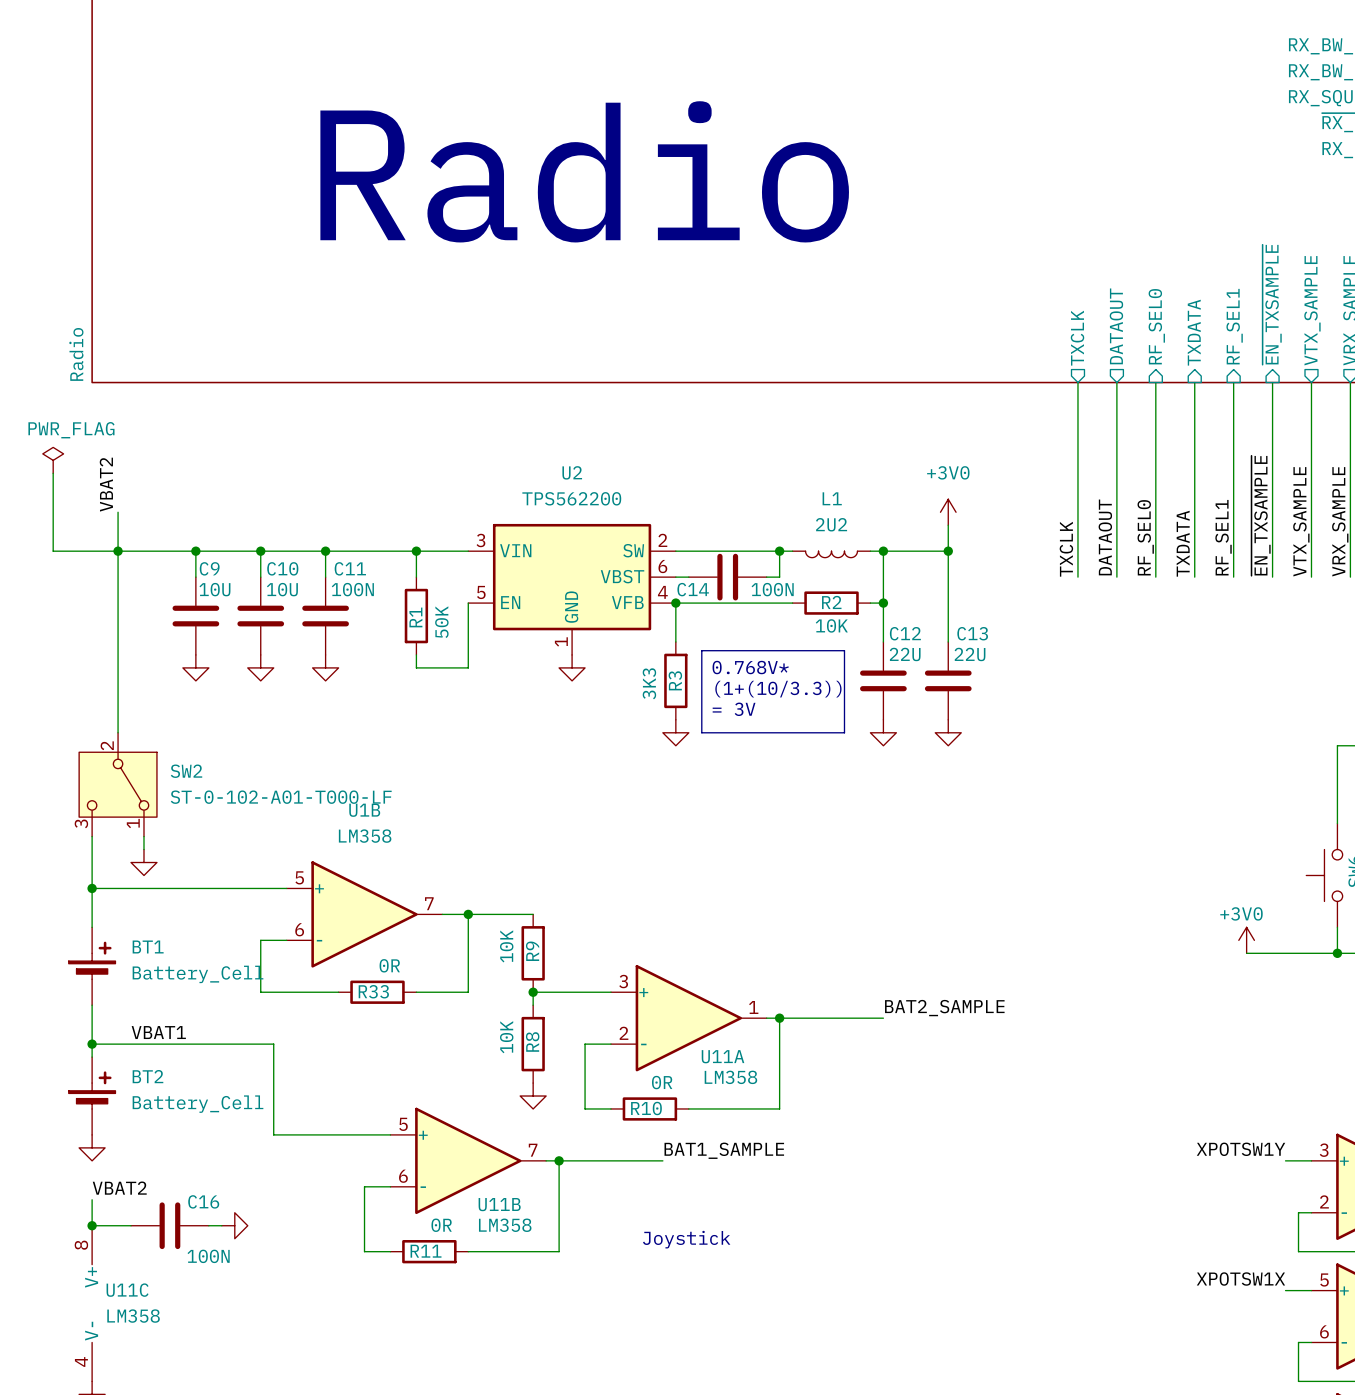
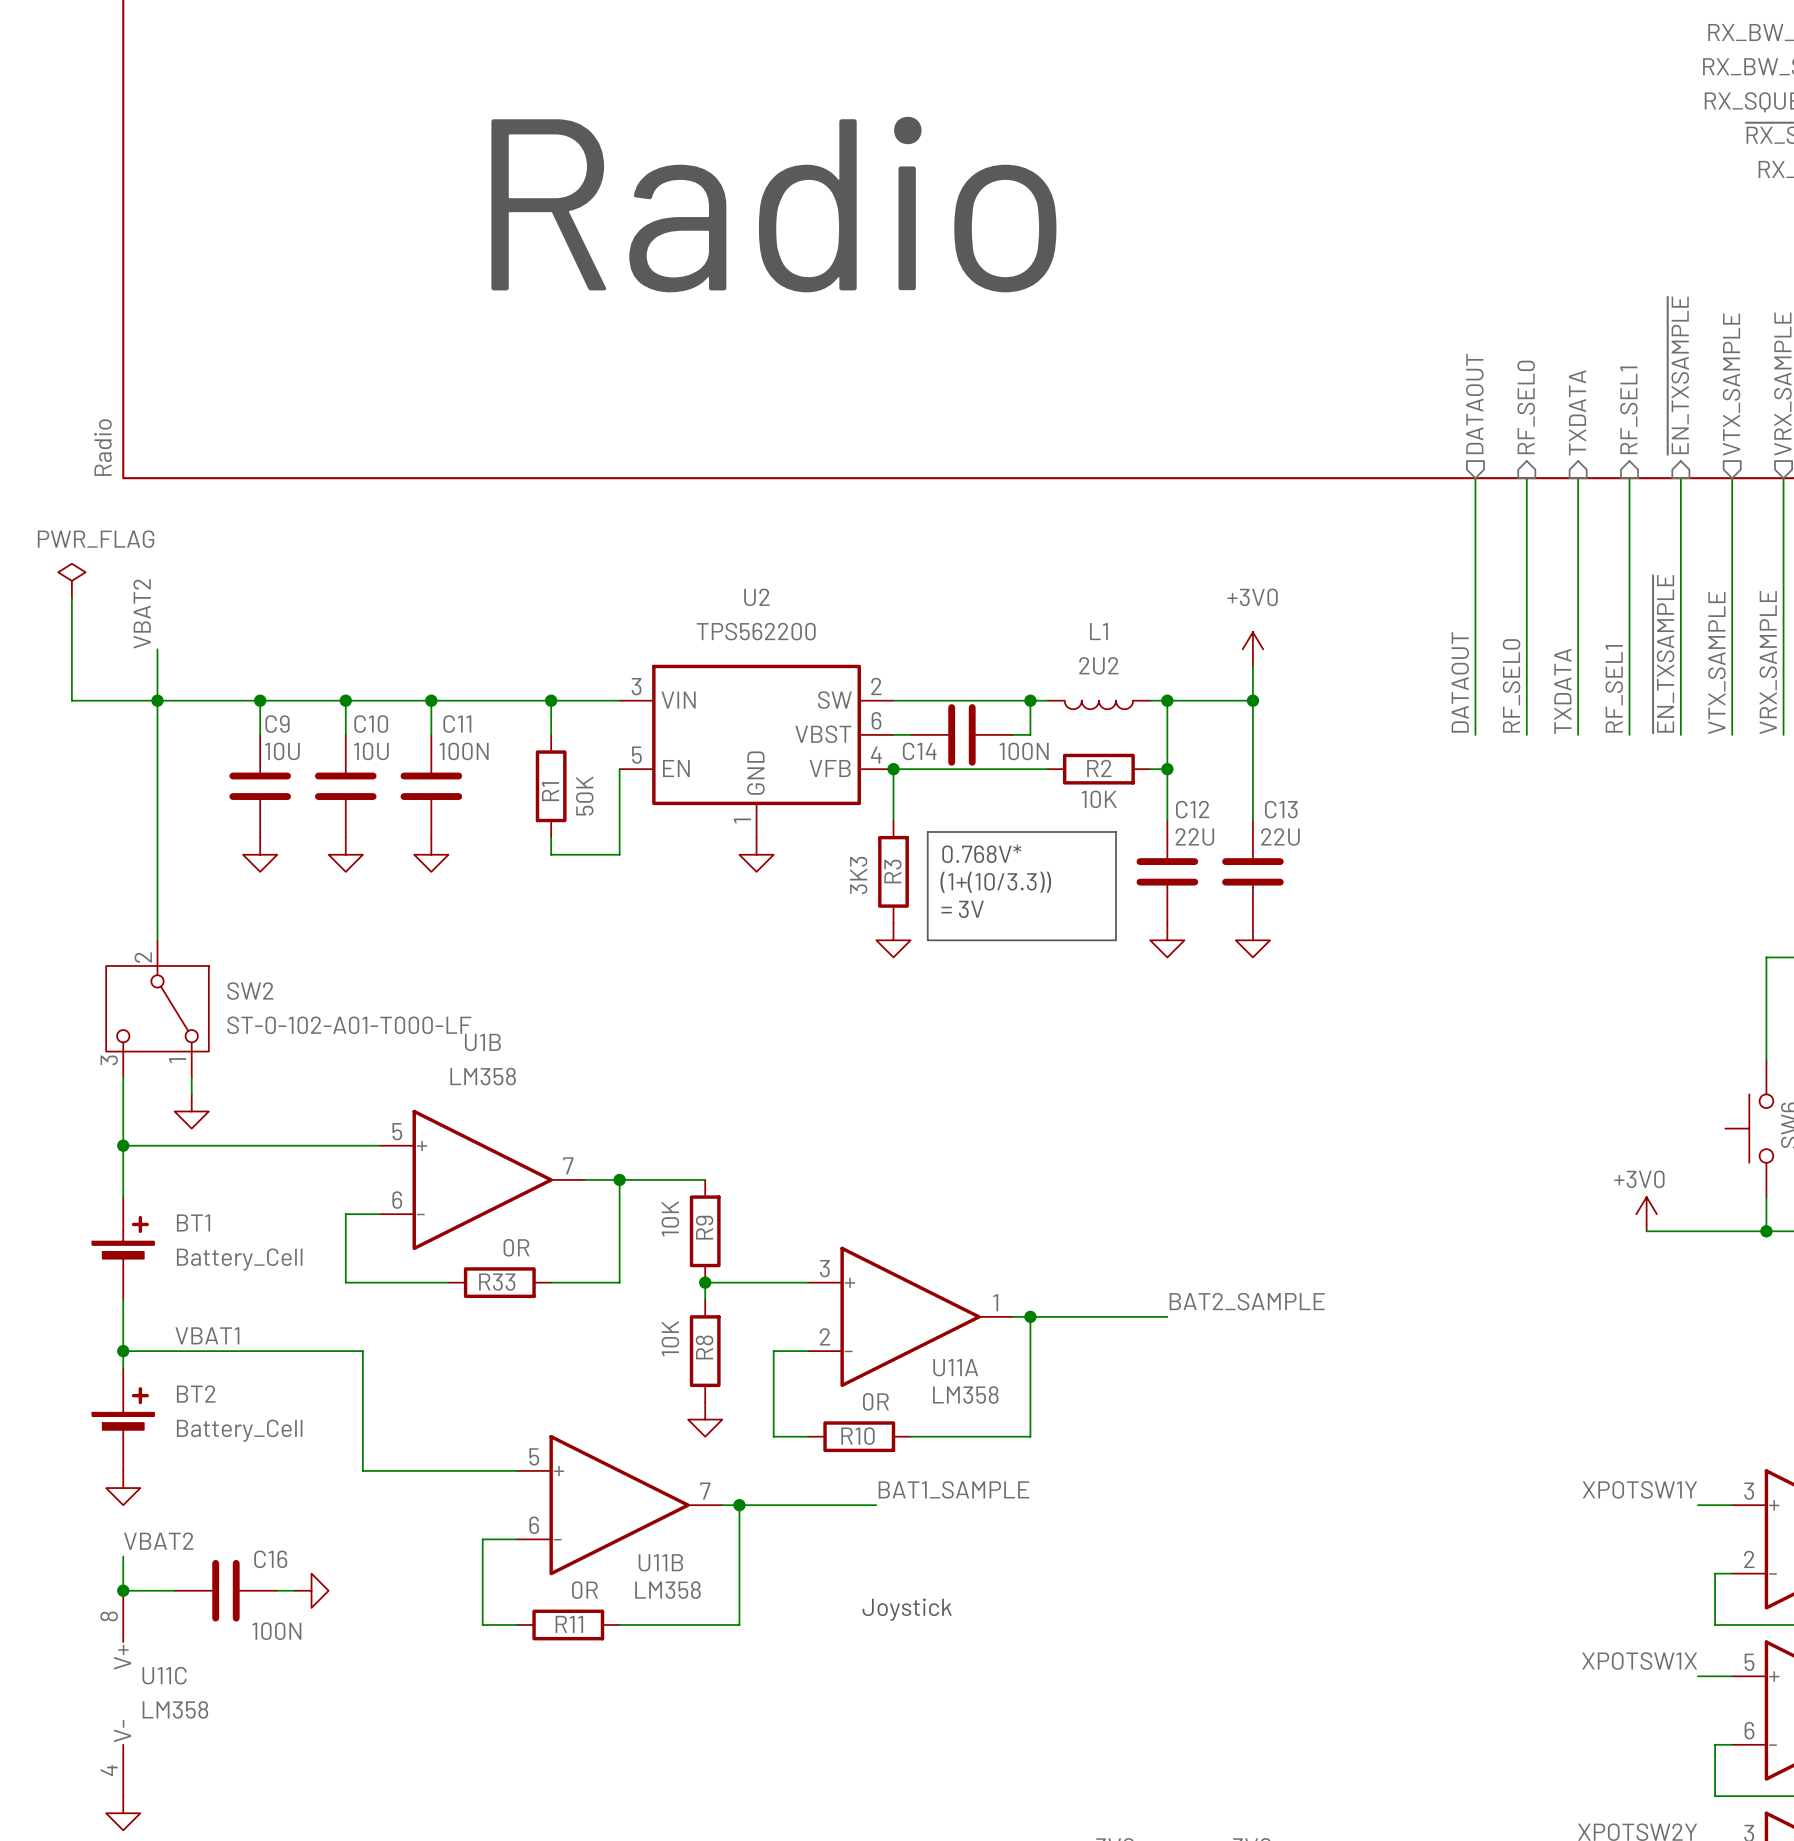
sheet pin: TXCLK (1077, 338) -> none
wire: (1077, 382) (1077, 577) -> none
label: TXCLK (1066, 549) -> none

